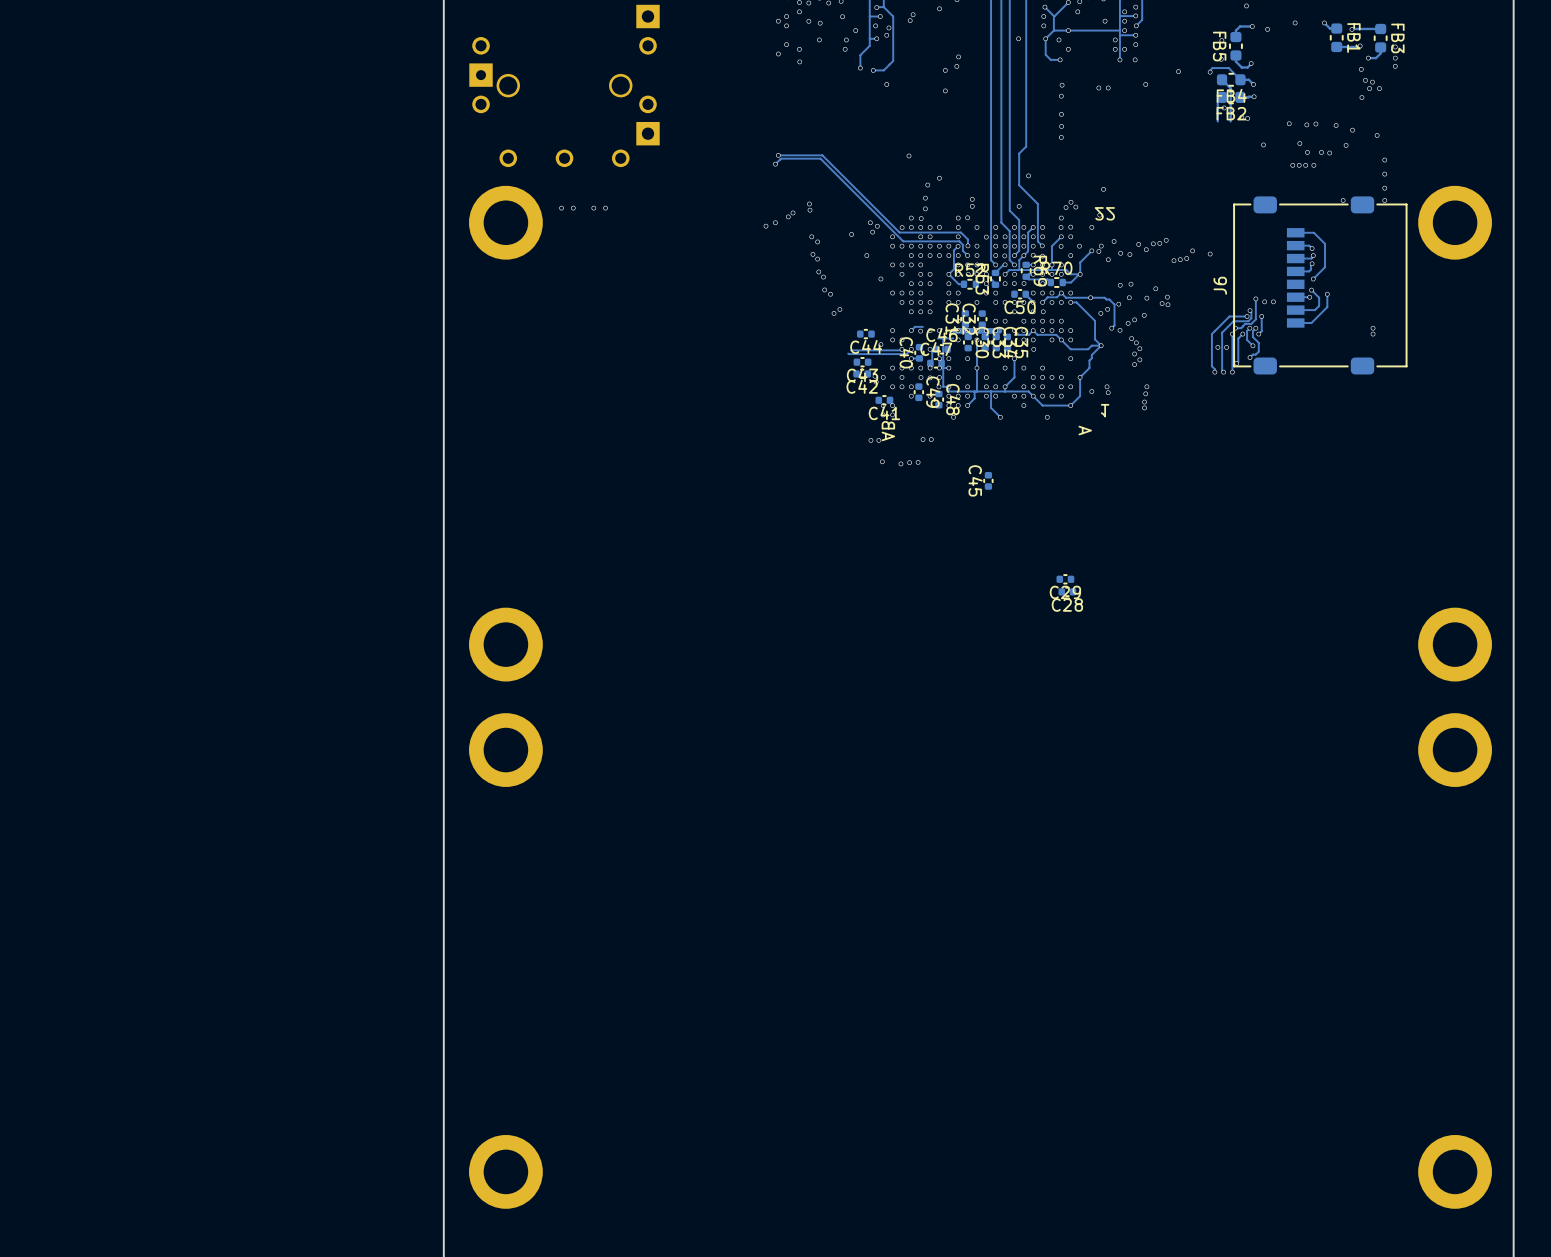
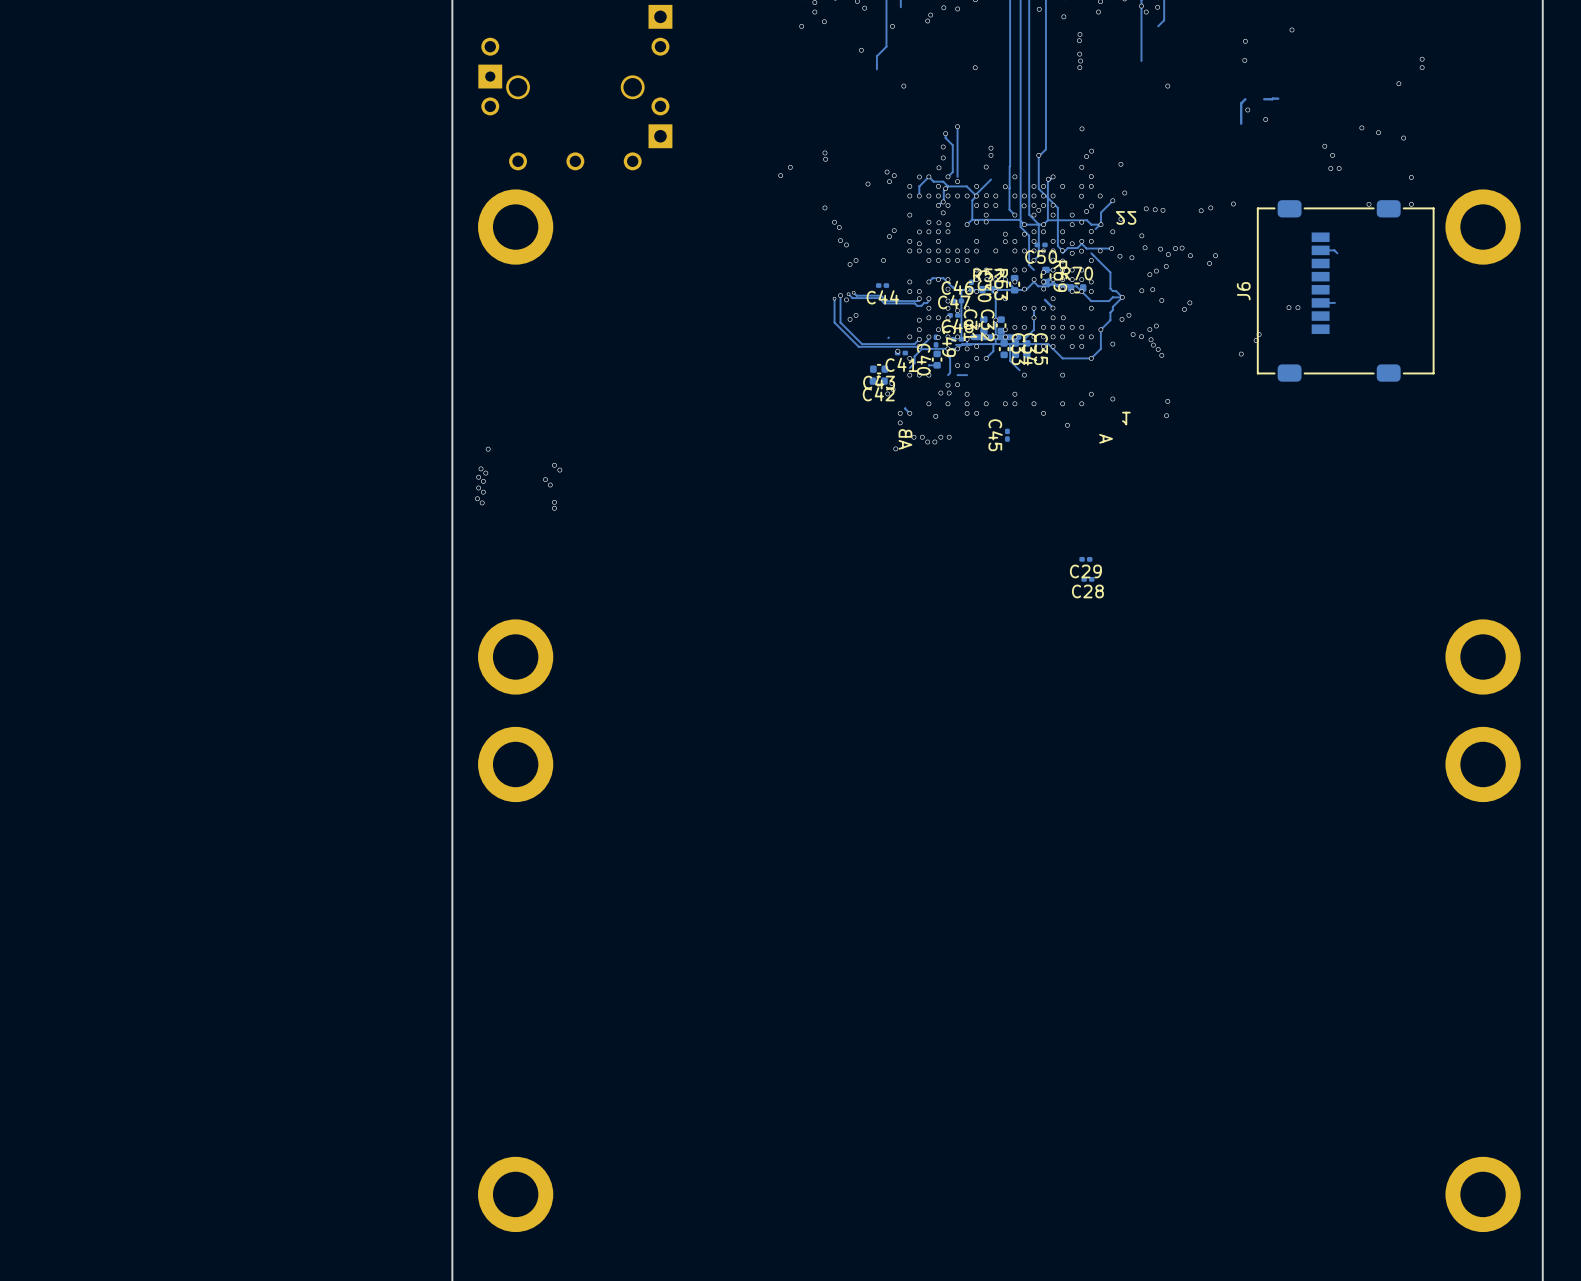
track: (1068, 2) (1053, 16) -> none
via: (1068, 2) -> none
via: (808, 3) -> none
via: (828, 3) -> none
via: none -> (1141, 6)
via: (1246, 5) -> none
track: (876, 7) (883, 7) (893, 16) (893, 61) (883, 70) (873, 70) -> none
via: (876, 7) -> none
via: none -> (943, 7)
track: (1044, 7) (1053, 16) -> none
via: (1044, 7) -> none
via: none -> (864, 8)
via: none -> (1039, 9)
track: (1119, 15) (1135, 15) -> none
via: (1135, 15) -> none
via: (786, 16) -> none
via: (842, 16) -> none
track: (880, 16) (869, 16) -> none
via: (880, 16) -> none
track: (1053, 16) (1053, 30) -> none
via: (778, 21) -> none
via: (1105, 21) -> none
via: (1124, 21) -> none
via: (1295, 22) -> none
track: (1324, 22) (1329, 28) (1336, 28) -> none
via: (1324, 22) -> none
via: (820, 23) -> none
via: (1043, 25) -> none
via: (1136, 25) -> none
track: (1252, 26) (1240, 26) (1235, 30) (1235, 37) -> none
via: (1252, 26) -> none
via: (888, 27) -> none
track: (1380, 28) (1351, 29) -> none
via: (1351, 29) -> none
via: (855, 30) -> none
track: (1053, 30) (1045, 38) (1045, 54) (1050, 59) (1060, 59) -> none
via: (1068, 30) -> none
track: (1119, 30) (1053, 30) -> none
via: (1124, 30) -> none
via: none -> (1079, 34)
via: (886, 35) -> none
track: (1135, 35) (1119, 35) -> none
via: (1135, 35) -> none
FB1: (1336, 37) -> none
track: (876, 38) (869, 38) -> none
via: (876, 38) -> none
via: (1018, 38) -> none
via: (1045, 38) -> none
FB3: (1380, 38) -> none
via: (819, 39) -> none
via: (1115, 39) -> none
via: (846, 40) -> none
via: (786, 44) -> none
via: (1135, 44) -> none
track: (1360, 45) (1336, 46) -> none
via: (1360, 45) -> none
FB5: (1235, 46) -> none
via: (1395, 46) -> none
track: (1380, 47) (1380, 53) (1375, 58) (1368, 58) -> none
via: (799, 49) -> none
via: (1068, 49) -> none
via: (1115, 49) -> none
via: (1124, 49) -> none
track: (1238, 52) (1235, 55) (1235, 61) (1241, 67) (1247, 67) (1251, 63) -> none
via: none -> (1079, 54)
via: (778, 54) -> none
via: (958, 56) -> none
via: (1368, 58) -> none
via: (1119, 59) -> none
via: (1135, 59) -> none
via: (799, 61) -> none
via: (1251, 63) -> none
via: none -> (1079, 67)
via: (860, 68) -> none
via: (1361, 69) -> none
via: (873, 70) -> none
via: (945, 70) -> none
via: (1178, 71) -> none
track: (1210, 72) (1212, 68) (1228, 68) (1240, 79) (1248, 79) (1253, 84) -> none
via: (1210, 72) -> none
track: (1222, 79) (1230, 88) (1230, 121) -> none
FB4: (1231, 79) -> none
via: (1365, 80) -> none
via: (1253, 84) -> none
via: (1062, 85) -> none
via: (1098, 87) -> none
via: (1108, 87) -> none
via: (1369, 88) -> none
via: (1379, 88) -> none
via: (945, 90) -> none
via: (1061, 96) -> none
via: (1254, 96) -> none
FB2: (1231, 97) -> none
via: (1361, 97) -> none
via: (1061, 114) -> none
via: (1247, 118) -> none
via: (1289, 123) -> none
track: none -> (957, 126) (957, 176)
via: none -> (957, 126)
via: (1306, 124) -> none
via: (1315, 124) -> none
track: none -> (945, 132) (945, 138) (952, 145) (952, 172) (948, 176)
via: none -> (945, 133)
via: (1061, 137) -> none
via: none -> (943, 147)
via: (1263, 144) -> none
via: none -> (990, 148)
via: (1346, 145) -> none
via: none -> (1091, 151)
via: none -> (824, 152)
via: none -> (990, 155)
via: none -> (1038, 155)
via: (1321, 152) -> none
via: none -> (1086, 156)
via: (1329, 153) -> none
via: none -> (943, 157)
track: (778, 155) (822, 155) (899, 232) (960, 232) (967, 239) (967, 245) -> none
via: (778, 155) -> none
via: (909, 155) -> none
via: none -> (825, 159)
track: (779, 159) (775, 164) -> none
track: (780, 159) (820, 158) (903, 241) (959, 241) (962, 244) (962, 250) (967, 255) -> none
via: (1384, 160) -> none
via: none -> (1120, 164)
track: (991, 162) (991, 260) (995, 264) -> (1010, 166) (1009, 209) (1014, 215)
via: none -> (986, 167)
via: none -> (938, 167)
via: none -> (1081, 167)
via: (1292, 165) -> none
via: (1299, 165) -> none
via: none -> (887, 172)
via: none -> (780, 175)
via: none -> (894, 175)
via: none -> (919, 177)
via: none -> (928, 176)
via: none -> (948, 176)
via: none -> (1014, 176)
track: none -> (1053, 176) (1047, 182) (1047, 220)
via: none -> (1053, 176)
via: none -> (1091, 176)
track: none -> (990, 179) (976, 196)
via: none -> (889, 181)
via: none -> (867, 184)
via: none -> (909, 186)
via: none -> (938, 186)
track: none -> (948, 186) (966, 186) (976, 196)
track: none -> (948, 186) (943, 181) (933, 181) (928, 176) (919, 186) (919, 195)
track: none -> (948, 186) (943, 190) (943, 200) (938, 205)
via: none -> (976, 186)
via: none -> (1033, 186)
via: none -> (1043, 186)
via: none -> (1062, 186)
via: none -> (1081, 186)
via: none -> (1091, 186)
via: none -> (1005, 186)
via: (1384, 188) -> none
via: none -> (986, 195)
via: none -> (909, 195)
via: none -> (919, 195)
via: none -> (928, 195)
via: none -> (938, 195)
via: none -> (948, 195)
via: none -> (957, 195)
via: none -> (967, 195)
track: none -> (976, 196) (972, 200) (972, 219) (967, 224)
via: none -> (976, 196)
via: none -> (995, 195)
via: none -> (1014, 195)
via: none -> (1024, 195)
via: none -> (1033, 195)
via: none -> (1043, 195)
via: none -> (1053, 195)
via: none -> (1081, 196)
via: none -> (1100, 195)
track: none -> (1112, 200) (1100, 212) (1100, 224) (1091, 224) (1086, 220) (1047, 220)
via: none -> (1112, 200)
via: (972, 199) -> none
via: none -> (1233, 203)
via: none -> (938, 205)
via: none -> (948, 205)
via: none -> (976, 205)
via: none -> (986, 205)
via: none -> (995, 205)
via: none -> (1024, 205)
via: none -> (1033, 205)
via: none -> (1043, 205)
via: none -> (1053, 205)
via: none -> (1146, 208)
via: none -> (1210, 207)
via: none -> (1155, 209)
via: (972, 206) -> none
via: none -> (1162, 210)
via: none -> (1201, 210)
via: (1075, 207) -> none
via: (561, 208) -> none
via: (573, 208) -> none
via: (593, 208) -> none
via: (605, 208) -> none
via: (810, 210) -> none
via: none -> (909, 215)
via: none -> (986, 215)
via: none -> (1014, 215)
via: none -> (1033, 215)
via: none -> (1053, 215)
via: none -> (1072, 215)
via: (793, 212) -> none
track: none -> (971, 219) (1019, 219) (1024, 224) (1043, 224) (1047, 220)
via: (788, 216) -> none
via: none -> (834, 222)
via: none -> (948, 224)
via: none -> (967, 224)
via: none -> (1024, 224)
via: none -> (1043, 224)
via: none -> (1072, 224)
track: none -> (1100, 224) (1095, 229)
via: none -> (1100, 224)
via: (775, 222) -> none
via: (870, 222) -> none
via: none -> (839, 227)
via: (765, 226) -> none
via: (939, 227) -> none
via: (958, 227) -> none
via: (976, 227) -> none
via: (995, 227) -> none
track: (1033, 227) (1028, 232) (1028, 251) (1019, 260) (1019, 270) -> none
via: (1033, 227) -> none
via: (1061, 227) -> none
via: none -> (1005, 234)
via: none -> (1024, 234)
via: none -> (1141, 235)
track: (1295, 232) (1313, 232) (1325, 243) (1325, 267) (1313, 278) -> none
via: (851, 234) -> none
via: (811, 236) -> none
via: none -> (840, 240)
via: (930, 236) -> none
via: (1005, 236) -> none
via: (1023, 236) -> none
track: (1061, 236) (1051, 246) (1051, 270) -> none
via: none -> (919, 243)
via: none -> (1072, 243)
via: none -> (846, 244)
via: (1166, 240) -> none
via: (817, 241) -> none
via: (1114, 241) -> none
track: none -> (1111, 248) (1086, 248) (1081, 243) (1077, 248) (1067, 248) (1062, 253)
via: none -> (1111, 248)
via: none -> (1145, 247)
via: (967, 245) -> none
track: (958, 246) (953, 250) (953, 269) (948, 274) (958, 284) (963, 284) -> none
via: (1101, 246) -> none
via: none -> (1072, 253)
track: none -> (1091, 253) (1110, 272) (1110, 288) (1122, 297)
via: (1312, 248) -> none
track: (1091, 250) (1080, 262) (1080, 274) (1070, 274) (1066, 270) (1009, 270) (1005, 274) -> none
via: (1091, 250) -> none
via: none -> (1190, 255)
via: none -> (1131, 257)
via: (1120, 253) -> none
via: (812, 254) -> none
via: (1129, 254) -> none
via: (1210, 254) -> none
via: none -> (856, 260)
via: (958, 255) -> none
via: (967, 255) -> none
via: (976, 255) -> none
via: (995, 255) -> none
via: (1004, 255) -> none
via: (1023, 255) -> none
via: (1313, 255) -> none
track: (1314, 255) (1311, 258) (1295, 258) -> none
via: (817, 259) -> none
via: none -> (850, 264)
via: (1108, 259) -> none
via: (1180, 259) -> none
via: (1173, 260) -> none
via: none -> (1166, 266)
track: (1312, 263) (1309, 271) (1295, 271) -> none
via: (1312, 263) -> none
via: (892, 264) -> none
via: (901, 264) -> none
via: (911, 264) -> none
via: (920, 264) -> none
via: (976, 264) -> none
track: (1005, 264) (995, 272) -> none
via: (1014, 264) -> none
via: none -> (1156, 271)
via: none -> (1043, 272)
via: none -> (1149, 274)
via: (818, 271) -> none
via: (901, 274) -> none
via: (948, 274) -> none
via: (1005, 274) -> none
track: (1079, 274) (1071, 282) (1062, 282) -> none
via: (1080, 274) -> none
via: none -> (909, 281)
track: none -> (928, 281) (932, 278) (943, 278) (956, 289) (1025, 289) (1033, 281) (1038, 286) (1048, 286) (1053, 281) (1057, 286) (1076, 286) (1091, 301) (1109, 301) (1112, 297) (1122, 297)
via: none -> (928, 281)
via: none -> (1014, 281)
via: none -> (1043, 281)
via: none -> (1091, 281)
via: (823, 277) -> none
via: (880, 278) -> none
via: (1313, 278) -> none
via: (911, 283) -> none
via: (920, 283) -> none
via: (986, 283) -> none
via: (1014, 283) -> none
track: none -> (961, 289) (961, 339) (967, 339) (967, 344)
via: none -> (909, 291)
via: none -> (919, 291)
via: none -> (976, 291)
via: none -> (995, 291)
via: none -> (1072, 291)
via: none -> (1081, 291)
via: none -> (1091, 291)
track: none -> (853, 292) (856, 295) (881, 295) (886, 301) (919, 301)
via: none -> (853, 292)
track: none -> (848, 294) (852, 298) (879, 298) (884, 303) (914, 303) (921, 305) (928, 301)
via: none -> (848, 294)
via: (1155, 288) -> none
C50 footprint: [1011, 289, 1030, 300] -> [1034, 242, 1048, 248]
track: (1311, 290) (1319, 297) (1319, 305) (1314, 310) (1295, 310) -> none
via: (1311, 290) -> none
track: none -> (1122, 297) (1112, 306) (1110, 320) (1100, 329) (1100, 348) (1091, 358) (1062, 358) (1048, 344) (962, 344) (957, 348) (921, 349) (914, 356) (914, 363) (909, 367)
via: none -> (1122, 297)
track: none -> (834, 298) (834, 322) (858, 346) (921, 346) (928, 339)
via: none -> (834, 298)
track: none -> (840, 298) (840, 322) (862, 344) (914, 344) (919, 339)
via: (892, 293) -> none
via: (920, 293) -> none
via: (948, 293) -> none
via: (958, 293) -> none
via: (995, 293) -> none
via: (1042, 293) -> none
via: (1051, 293) -> none
via: (1061, 293) -> none
via: (1070, 293) -> none
via: none -> (1161, 300)
track: (1327, 294) (1327, 307) (1311, 322) (1295, 322) -> none
via: (1327, 294) -> none
via: none -> (948, 301)
via: (1090, 297) -> none
via: (1129, 297) -> none
via: (1309, 297) -> none
via: (1146, 298) -> none
track: (1255, 298) (1255, 319) (1251, 323) (1245, 323) (1242, 326) -> none
via: (1255, 298) -> none
via: (901, 302) -> none
via: (920, 302) -> none
via: (958, 302) -> none
via: (976, 302) -> none
via: (995, 302) -> none
track: (1042, 302) (1047, 297) (1057, 297) (1061, 293) (1066, 297) (1104, 297) (1114, 304) (1114, 325) (1111, 328) -> none
via: (1042, 302) -> none
via: (1051, 302) -> none
via: (1061, 302) -> none
track: (1070, 302) (1076, 302) (1095, 320) (1095, 339) (1101, 345) -> none
via: none -> (957, 310)
via: (1118, 304) -> none
via: (1167, 304) -> none
track: (1250, 310) (1251, 318) (1248, 321) (1233, 321) (1222, 332) (1223, 372) -> none
via: (1250, 310) -> none
via: none -> (919, 320)
via: none -> (995, 320)
via: (1144, 315) -> none
track: (1247, 316) (1229, 316) (1211, 334) (1211, 366) (1214, 372) -> none
via: (1247, 316) -> none
track: (1261, 316) (1261, 331) (1258, 334) -> none
via: (1261, 316) -> none
via: none -> (919, 329)
via: none -> (938, 329)
via: none -> (1005, 329)
via: none -> (1100, 329)
track: (922, 326) (915, 326) (911, 330) -> none
track: (1242, 326) (1235, 328) -> none
track: (1249, 328) (1247, 330) (1247, 339) (1252, 345) -> none
via: (1249, 328) -> none
track: (1255, 328) (1252, 331) (1252, 337) (1258, 342) (1258, 351) (1250, 357) -> none
via: (1255, 328) -> none
via: (1373, 328) -> none
C44 footprint: [856, 329, 875, 339] -> [875, 283, 890, 288]
via: (958, 330) -> none
track: (1014, 330) (1018, 334) (1028, 334) (1033, 330) (1037, 334) (1056, 334) (1070, 349) (1088, 349) (1091, 345) (1101, 345) -> none
via: (1051, 330) -> none
track: none -> (888, 337) (888, 338)
via: none -> (919, 339)
via: none -> (967, 339)
C30 footprint: [963, 333, 974, 352] -> [969, 279, 974, 293]
via: none -> (1151, 339)
track: (1232, 334) (1232, 372) -> none
track: (1242, 334) (1238, 338) (1236, 363) -> none
via: (1242, 334) -> none
via: (1258, 334) -> none
via: (1373, 334) -> none
via: none -> (1112, 344)
track: (943, 338) (943, 386) (948, 386) (948, 391) (1028, 391) (1042, 405) (1070, 405) (1080, 396) (1080, 377) (1089, 368) (1091, 355) (1101, 345) -> none
via: (892, 339) -> none
track: (976, 339) (976, 391) -> (995, 291) (995, 344)
via: (976, 339) -> none
via: (1070, 339) -> none
via: none -> (948, 348)
via: none -> (957, 348)
via: none -> (967, 348)
C46 footprint: [933, 344, 951, 355] -> [950, 298, 965, 304]
via: (1101, 345) -> none
via: (1252, 345) -> none
via: (1226, 347) -> none
track: (901, 349) (851, 350) -> none
via: (901, 349) -> none
track: (911, 349) (906, 354) (848, 353) -> none
via: (911, 349) -> none
via: (930, 349) -> none
via: (1033, 349) -> none
via: none -> (909, 358)
via: none -> (976, 358)
via: none -> (986, 358)
via: none -> (1091, 358)
via: (1134, 353) -> none
via: (1250, 357) -> none
via: (911, 358) -> none
C47 footprint: [927, 358, 945, 369] -> [947, 313, 961, 318]
via: (967, 358) -> none
track: (1014, 358) (1014, 377) (1005, 386) (1005, 391) -> (1033, 310) (1033, 329) (1024, 339) (1024, 344)
via: (1014, 358) -> none
via: (1070, 358) -> none
via: (1139, 359) -> none
via: (1236, 363) -> none
via: (1134, 364) -> none
via: (920, 368) -> none
via: (930, 368) -> none
via: (939, 368) -> none
via: (948, 368) -> none
via: (976, 368) -> none
via: (1023, 368) -> none
via: (1214, 372) -> none
via: (1223, 372) -> none
via: (1232, 372) -> none
via: (883, 377) -> none
via: (901, 377) -> none
via: (920, 377) -> none
via: (958, 377) -> none
via: (986, 377) -> none
via: (1033, 377) -> none
via: (1042, 377) -> none
via: (1051, 377) -> none
via: (1061, 377) -> none
via: (1080, 377) -> none
C49 footprint: [913, 383, 924, 402] -> [933, 334, 939, 348]
via: none -> (940, 393)
via: none -> (949, 393)
via: none -> (887, 393)
via: (892, 386) -> none
via: (901, 386) -> none
via: (911, 386) -> none
via: (938, 386) -> none
via: (967, 386) -> none
via: (986, 386) -> none
via: (1005, 386) -> none
via: (1023, 386) -> none
via: (1033, 386) -> none
via: (1042, 386) -> none
via: (1061, 386) -> none
via: (1107, 386) -> none
via: (1146, 386) -> none
C48 footprint: [933, 390, 944, 409] -> [950, 336, 965, 342]
track: (974, 391) (974, 398) (967, 405) -> (993, 344) (993, 351) (986, 358)
track: (991, 391) (991, 407) (1000, 417) -> (1010, 344) (1010, 360) (1019, 370)
via: (1108, 392) -> none
C41 footprint: [875, 395, 894, 406] -> [894, 350, 908, 356]
via: (958, 396) -> none
via: (1023, 396) -> none
via: (1033, 396) -> none
via: (1051, 396) -> none
via: (1144, 402) -> none
via: (967, 405) -> none
via: (1070, 405) -> none
via: none -> (935, 416)
via: (892, 414) -> none
via: (953, 417) -> none
via: (1000, 417) -> none
via: none -> (913, 437)
via: none -> (922, 437)
via: none -> (940, 437)
via: none -> (949, 437)
via: none -> (927, 442)
via: none -> (934, 442)
via: (923, 439) -> none
via: (931, 439) -> none
via: none -> (488, 449)
via: (870, 440) -> none
via: none -> (554, 465)
via: none -> (481, 468)
via: none -> (559, 470)
via: (882, 461) -> none
via: (909, 462) -> none
via: (918, 462) -> none
via: (900, 463) -> none
via: none -> (485, 473)
via: none -> (478, 477)
via: none -> (545, 479)
C45 footprint: [983, 471, 994, 490] -> [1005, 428, 1010, 442]
via: none -> (483, 481)
via: none -> (550, 485)
via: none -> (478, 487)
via: none -> (483, 492)
via: none -> (477, 498)
via: none -> (554, 502)
via: none -> (482, 502)
via: none -> (554, 508)
C29 footprint: [1056, 574, 1075, 585] -> [1079, 556, 1093, 562]
C28 footprint: [1058, 586, 1077, 597] -> [1081, 576, 1095, 582]

